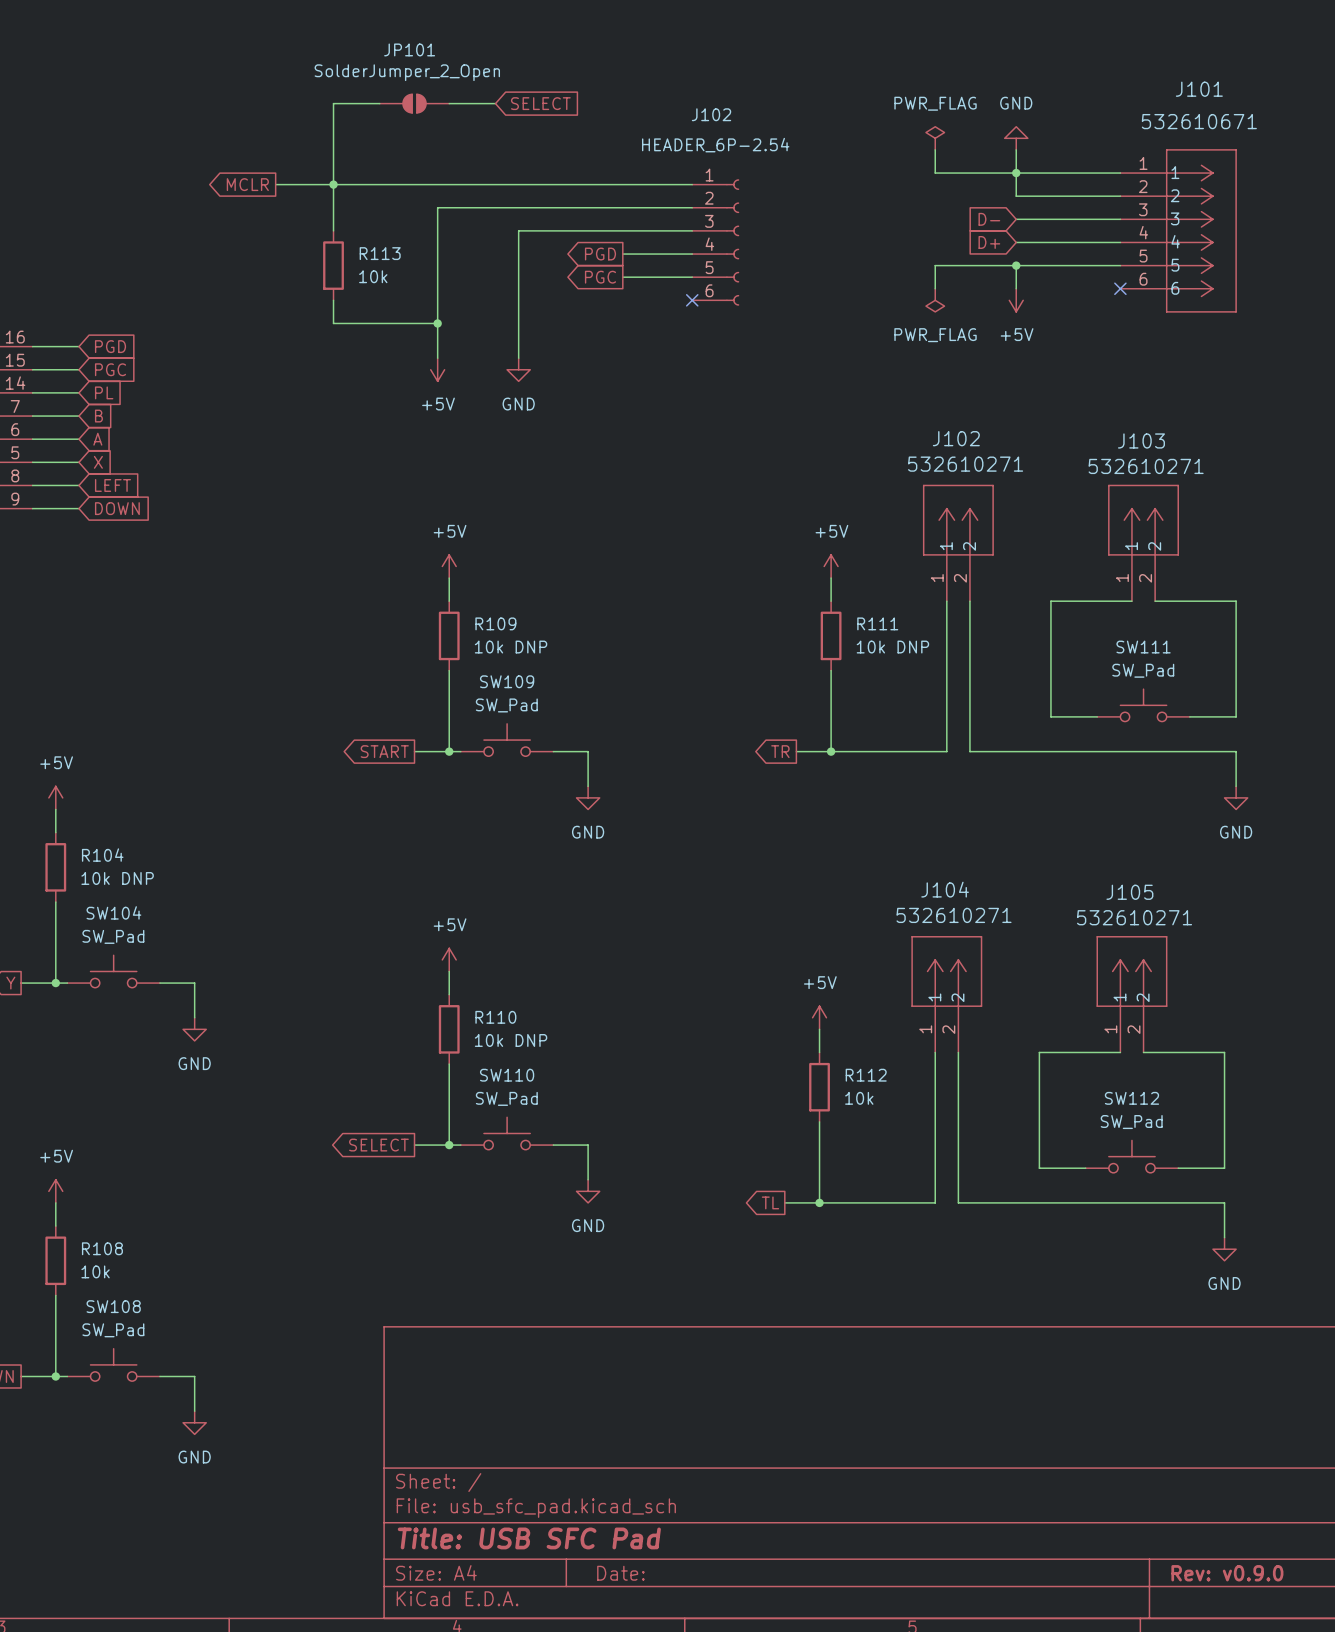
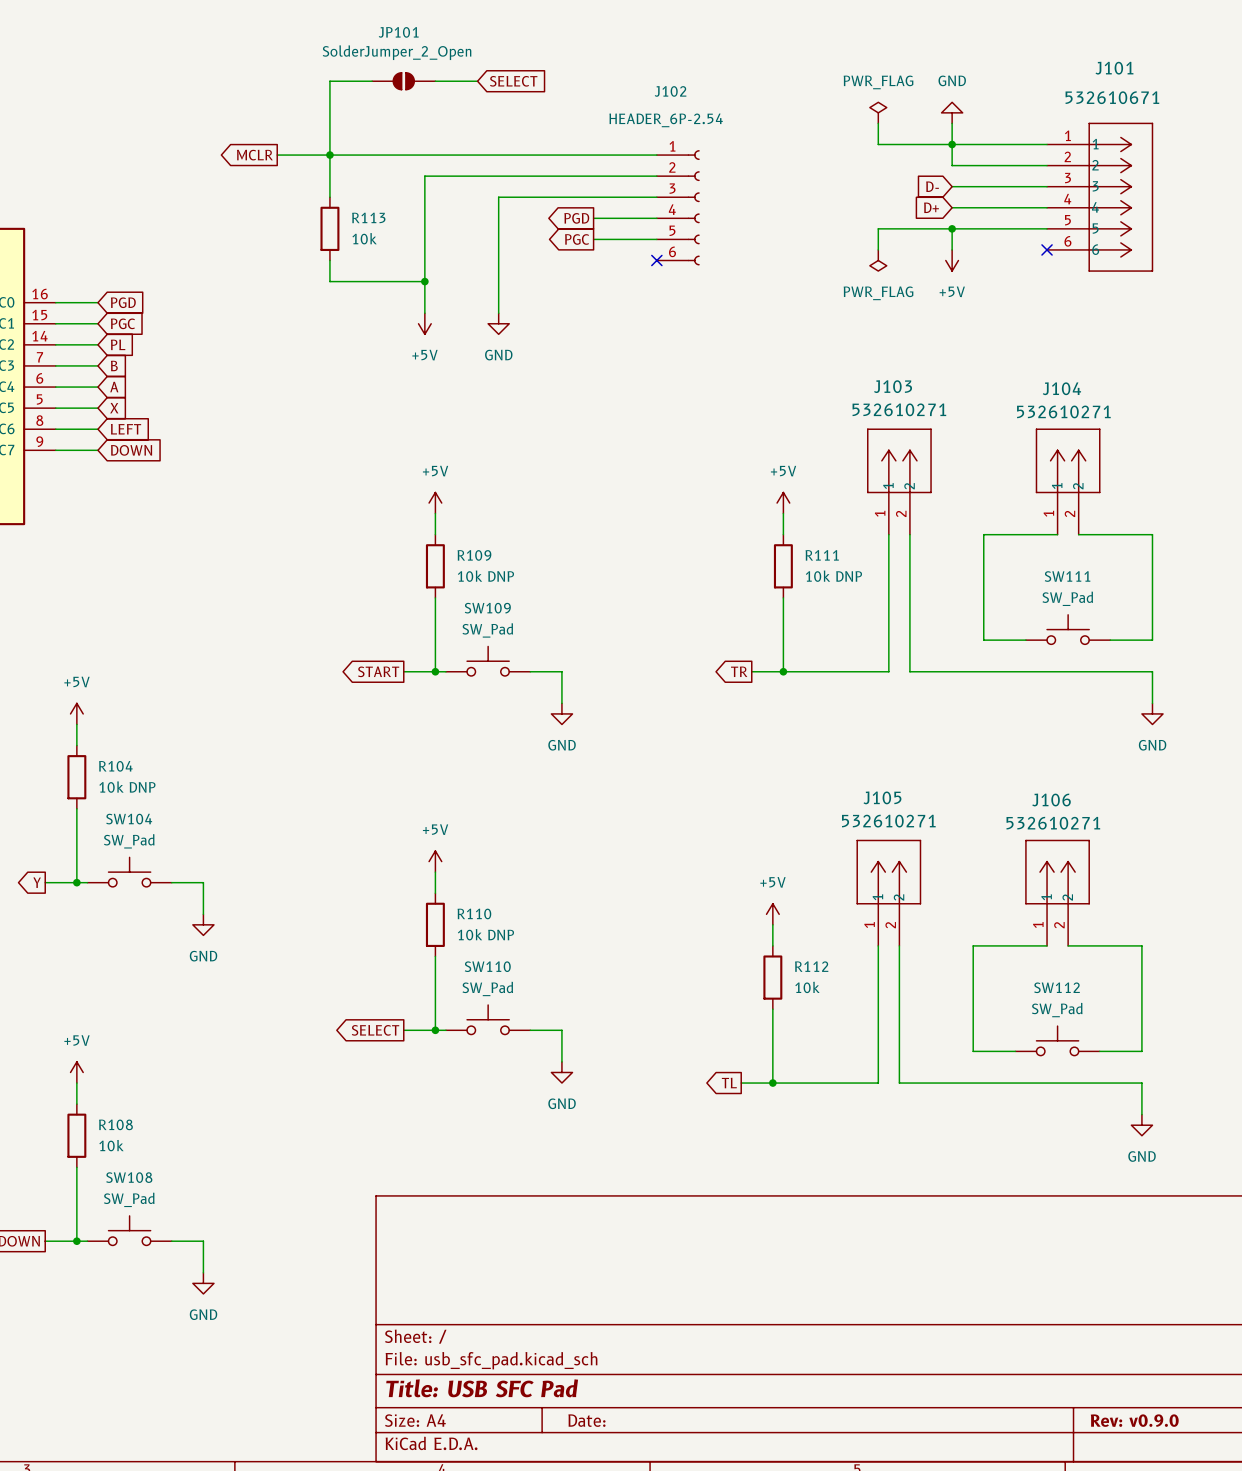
J102 name: J102 (956, 438) -> J103 (893, 386)
J103 name: J103 (1141, 440) -> J104 (1061, 388)
J104 name: J104 (945, 889) -> J105 (882, 797)
J105 name: J105 (1129, 892) -> J106 (1051, 800)

